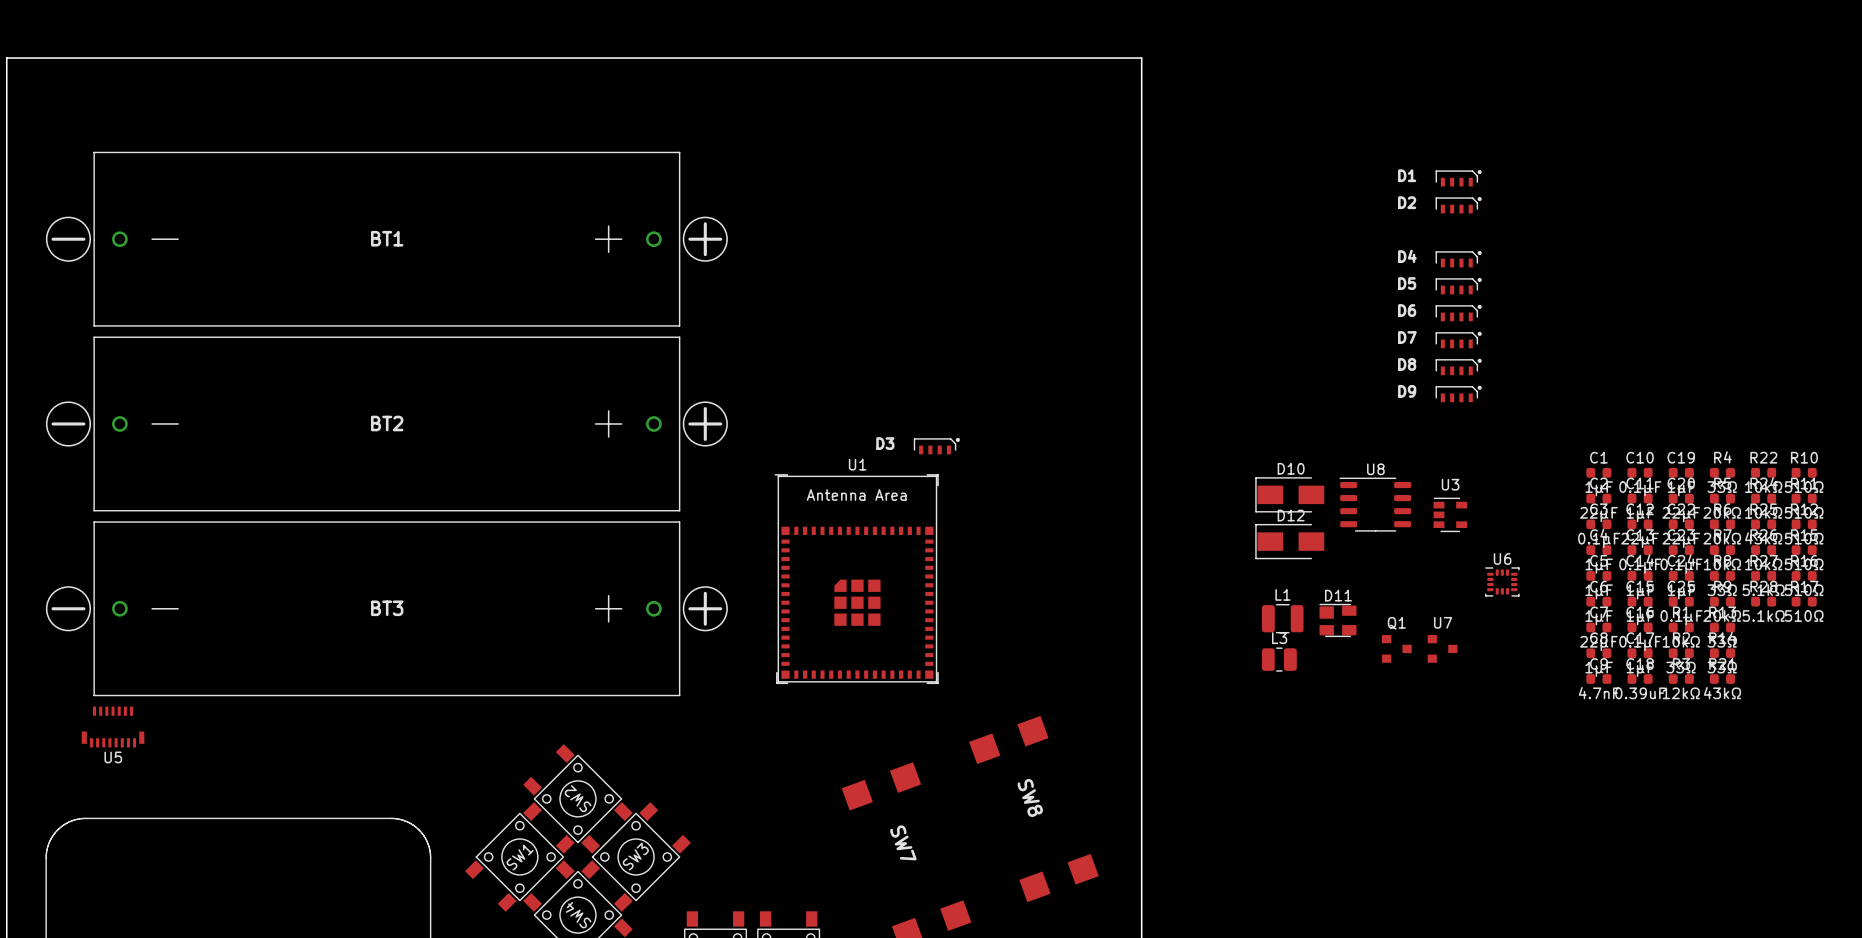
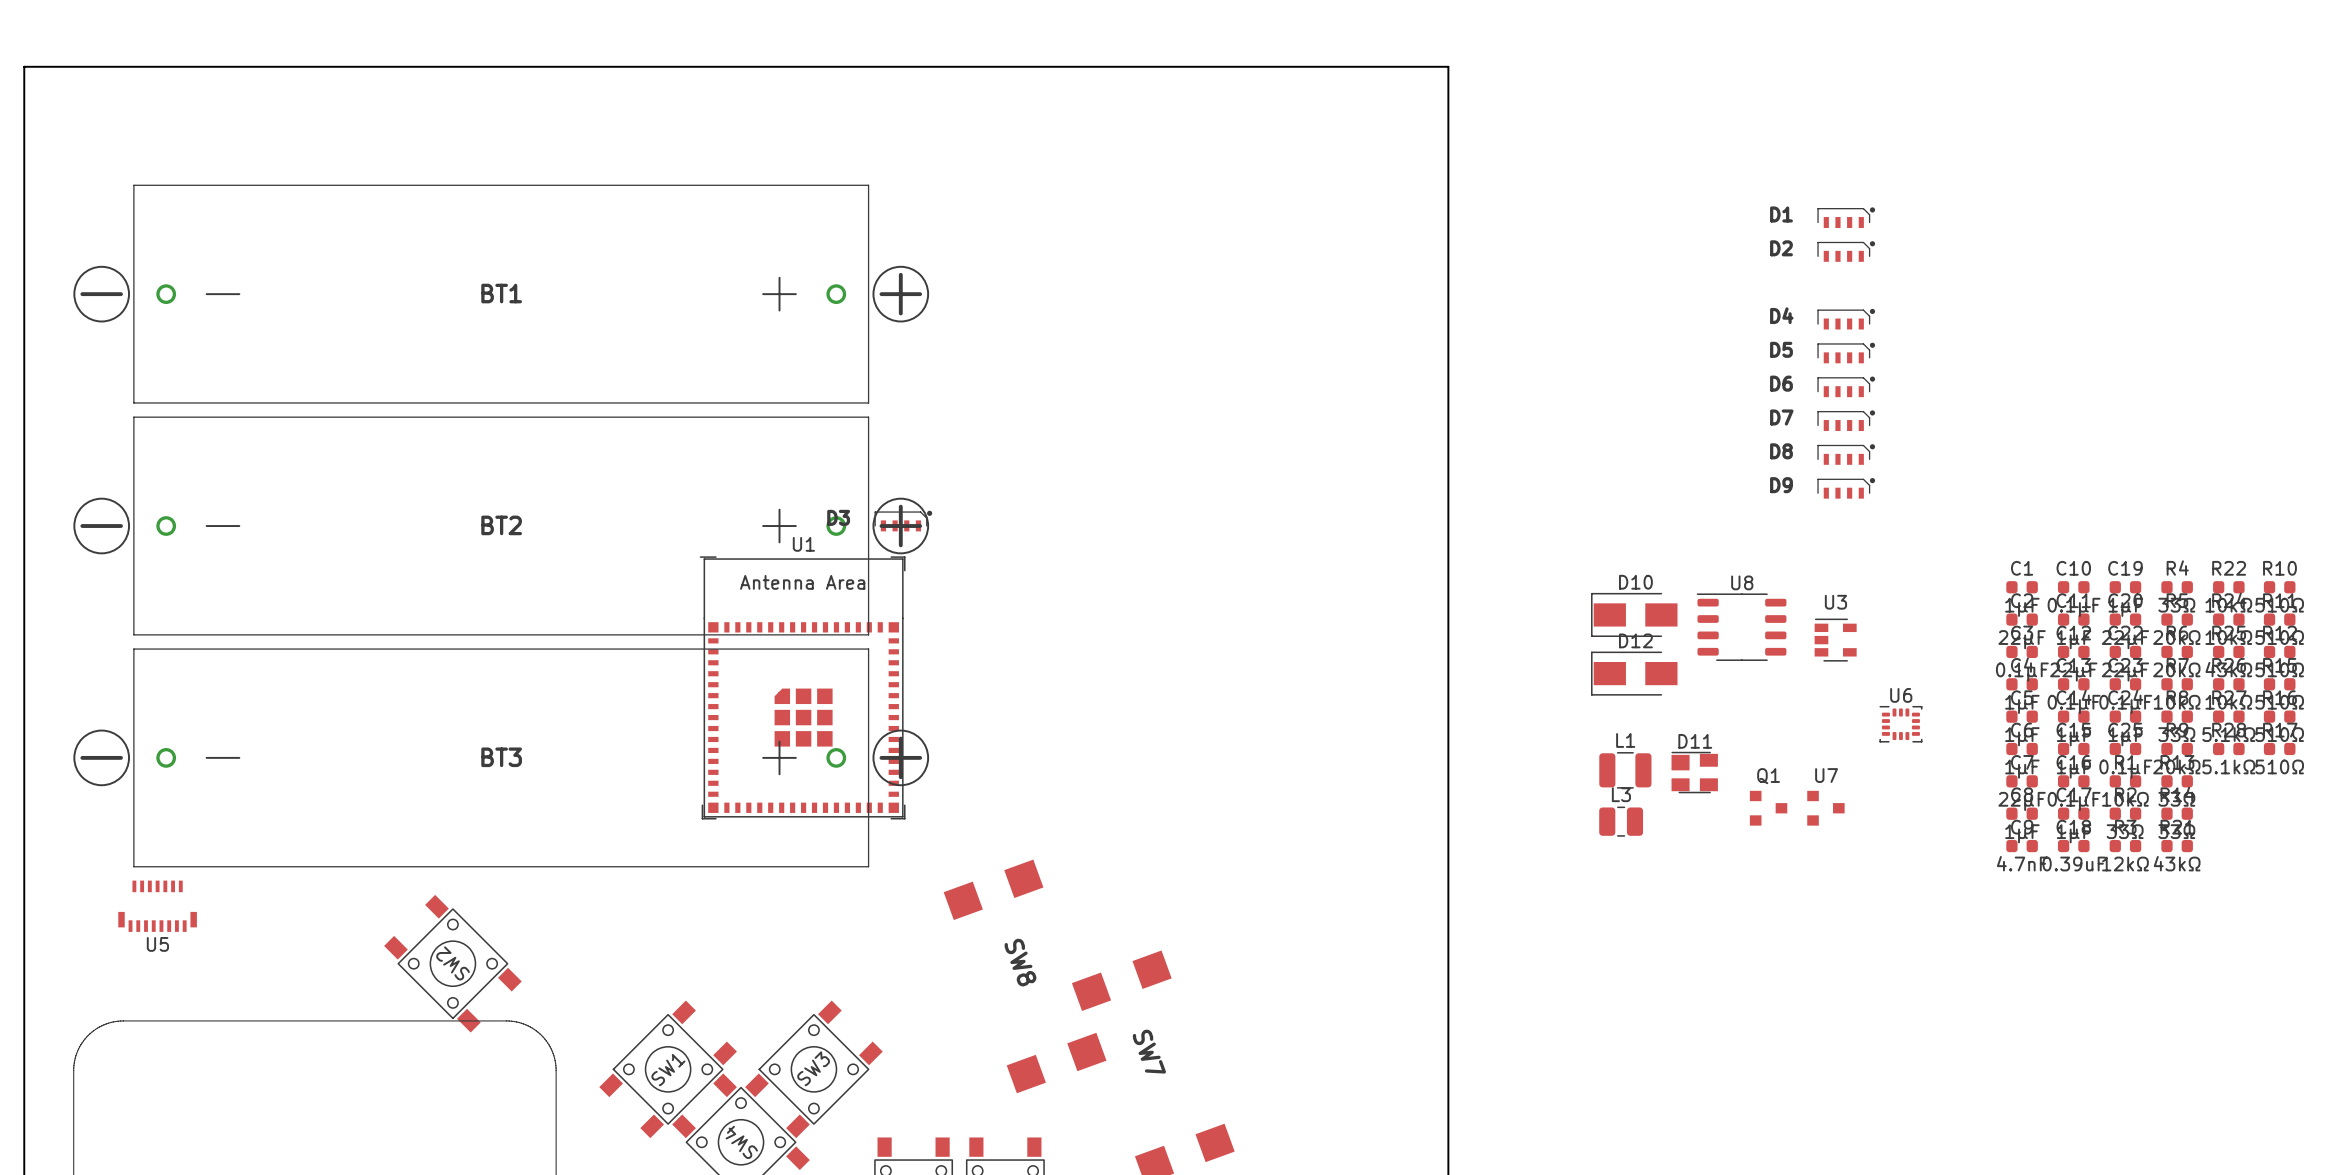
D3 position: (936, 446) -> (903, 521)
U1 position: (856, 579) -> (802, 687)
SW2 position: (577, 798) -> (452, 963)
SW8 position: (1033, 809) -> (1025, 976)

